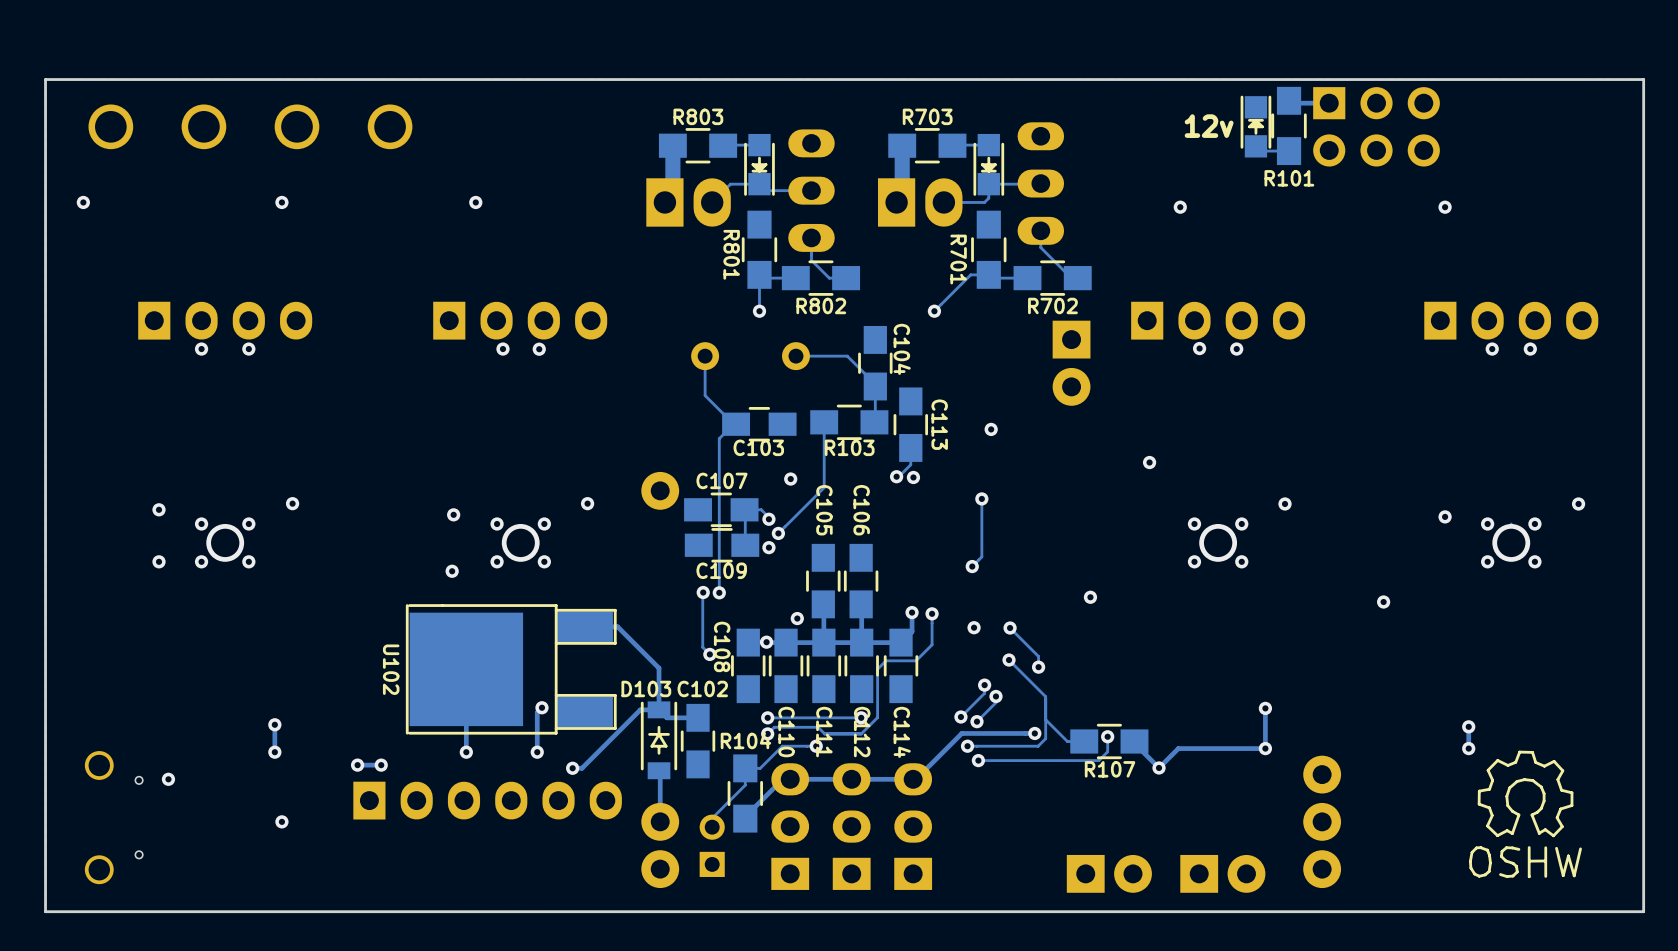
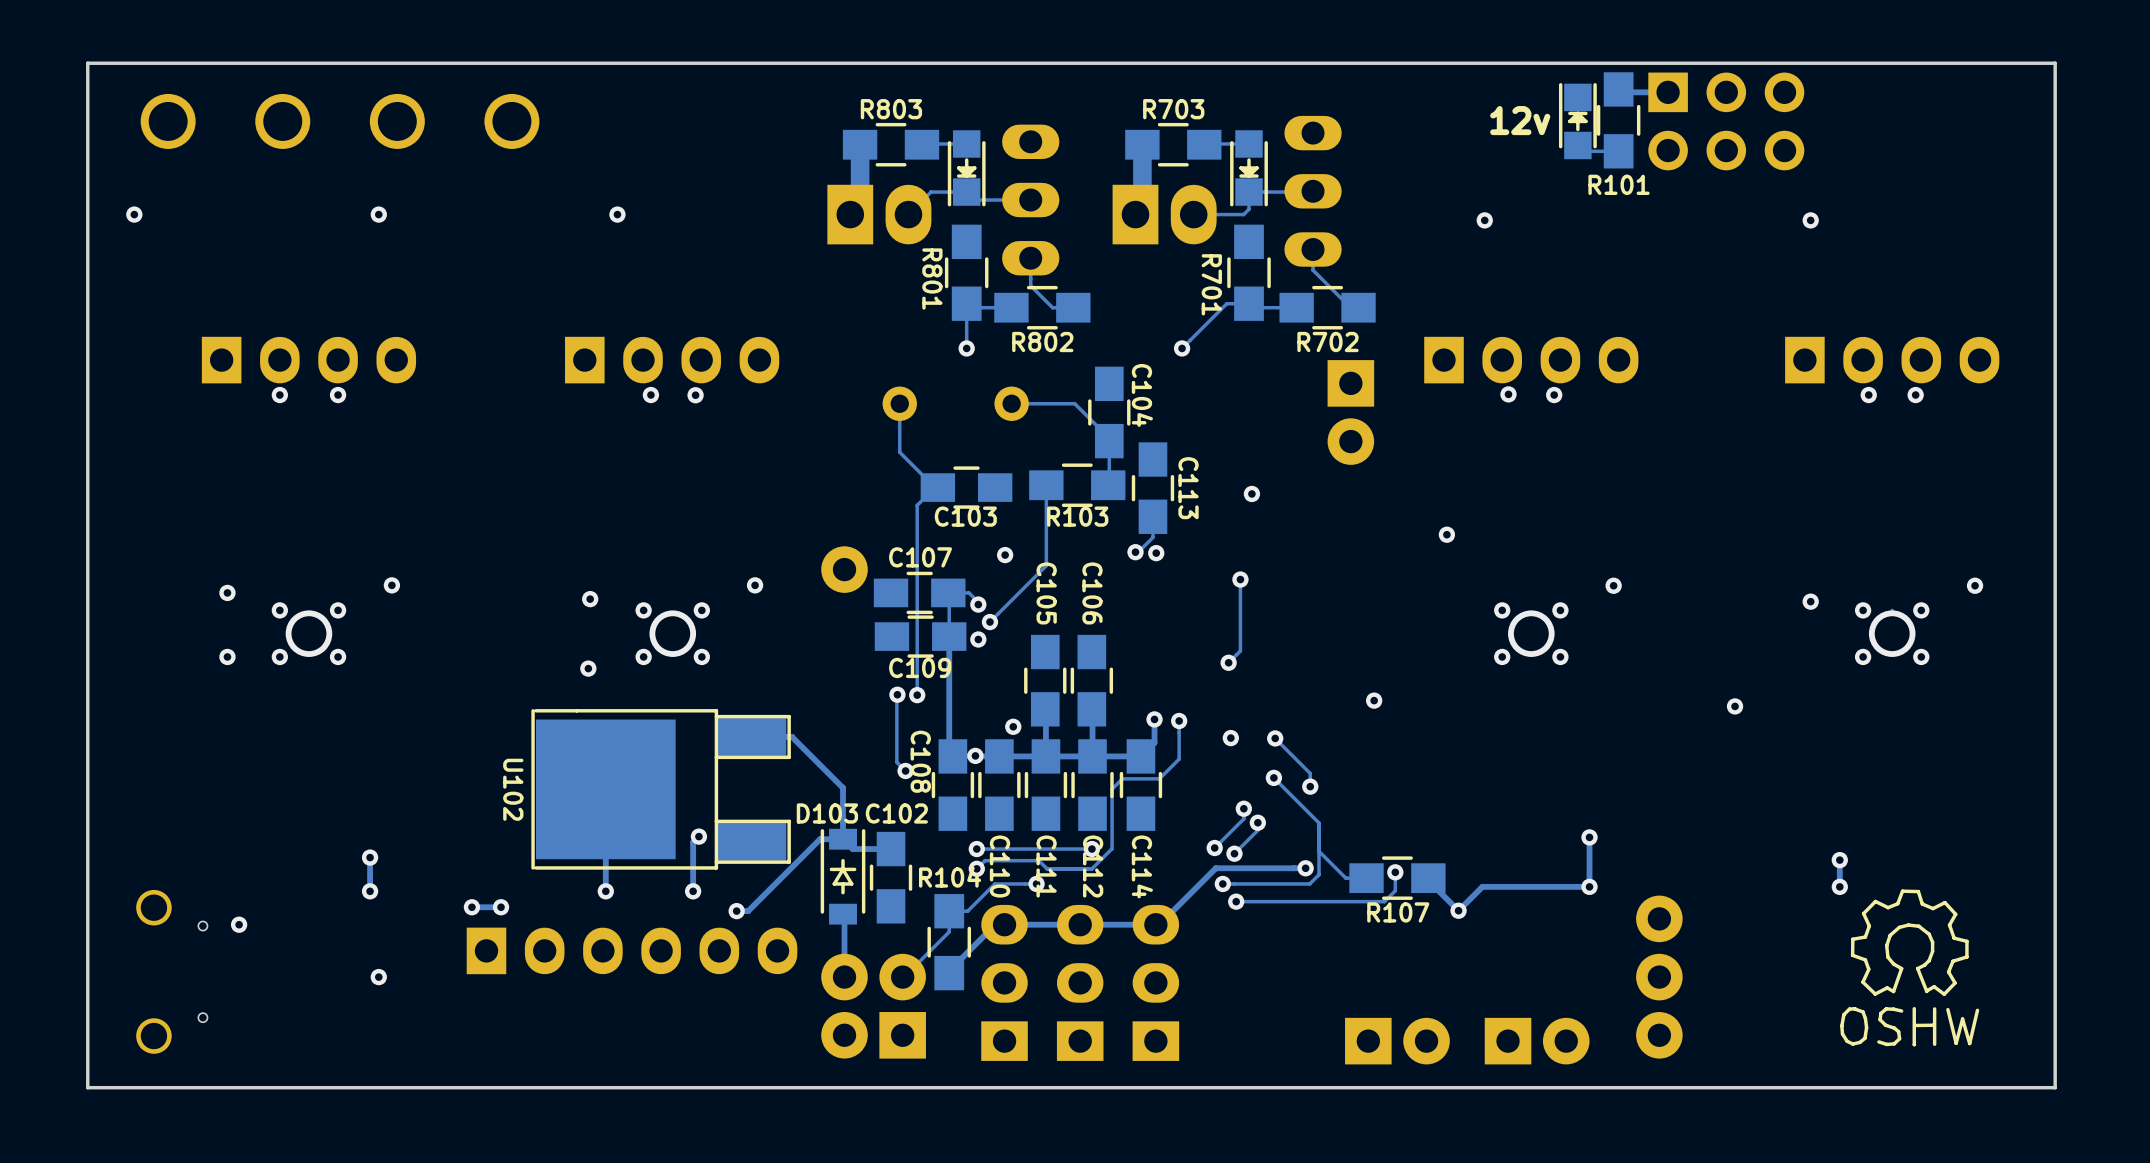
track: none -> (949, 636) (949, 752) (952, 756)
part footprint: [699, 814, 725, 877] -> [879, 953, 926, 1059]

